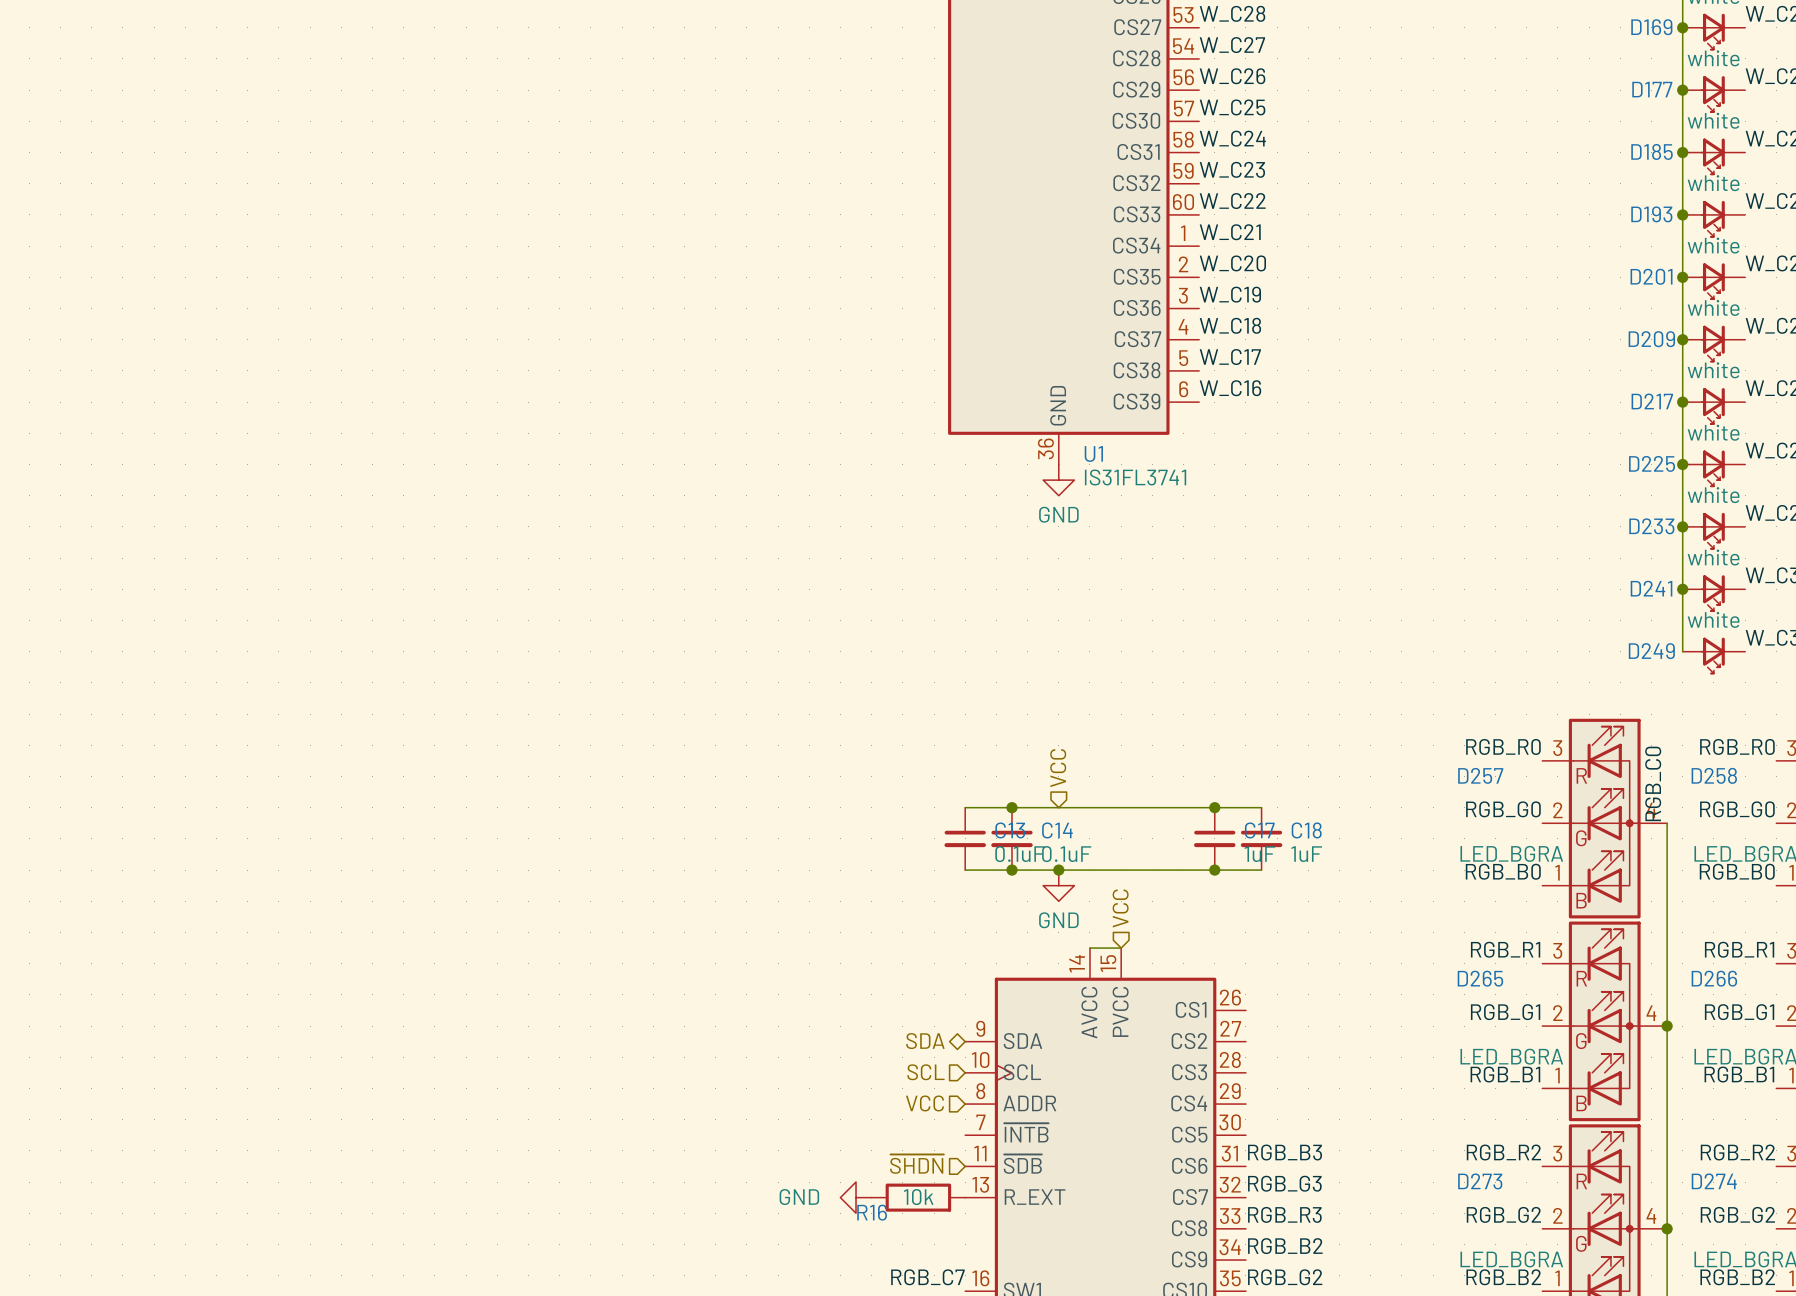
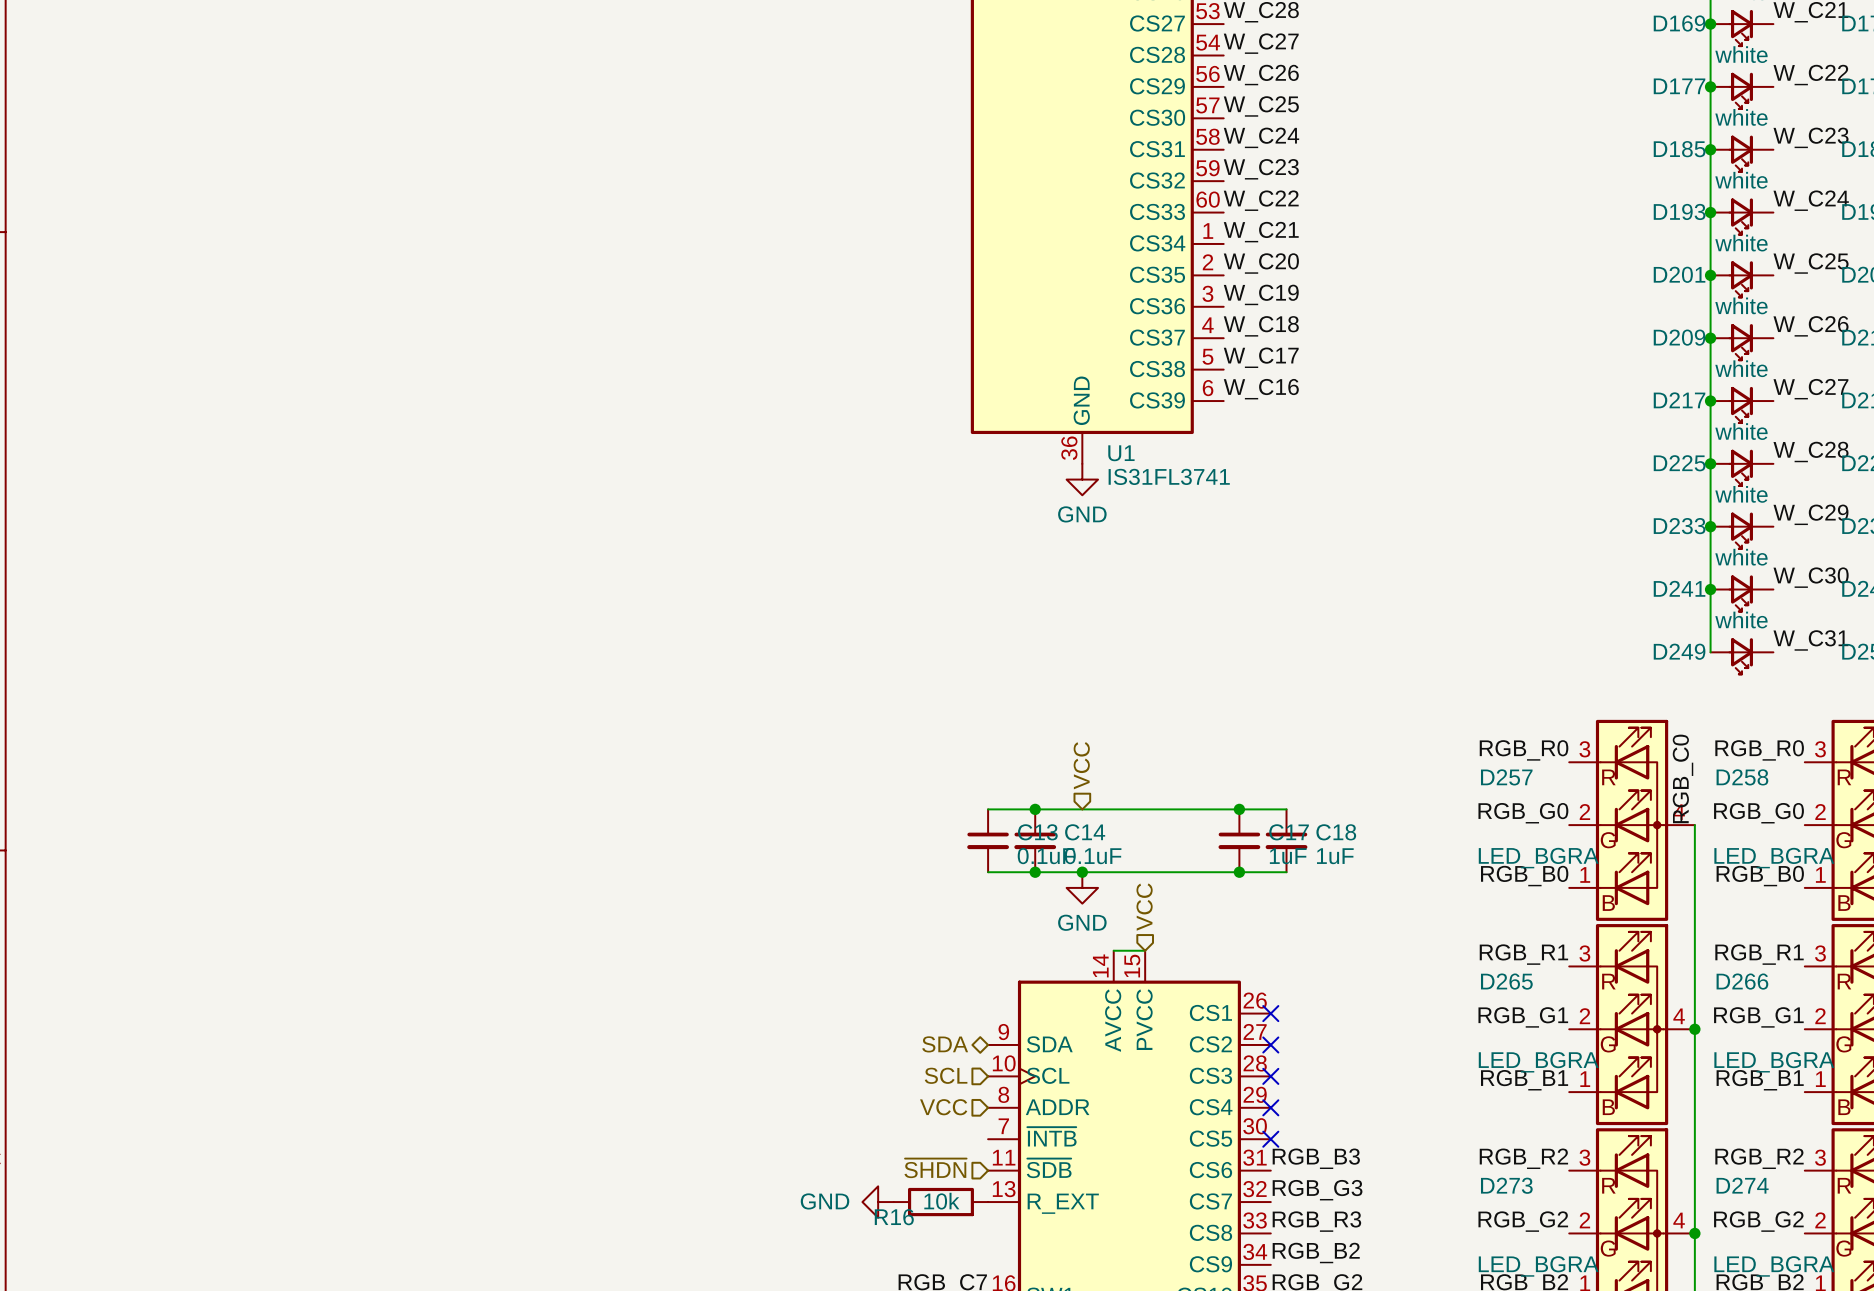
no-connect mark: none -> (1270, 1013)
no-connect mark: none -> (1270, 1044)
no-connect mark: none -> (1270, 1076)
no-connect mark: none -> (1270, 1107)
no-connect mark: none -> (1270, 1139)

